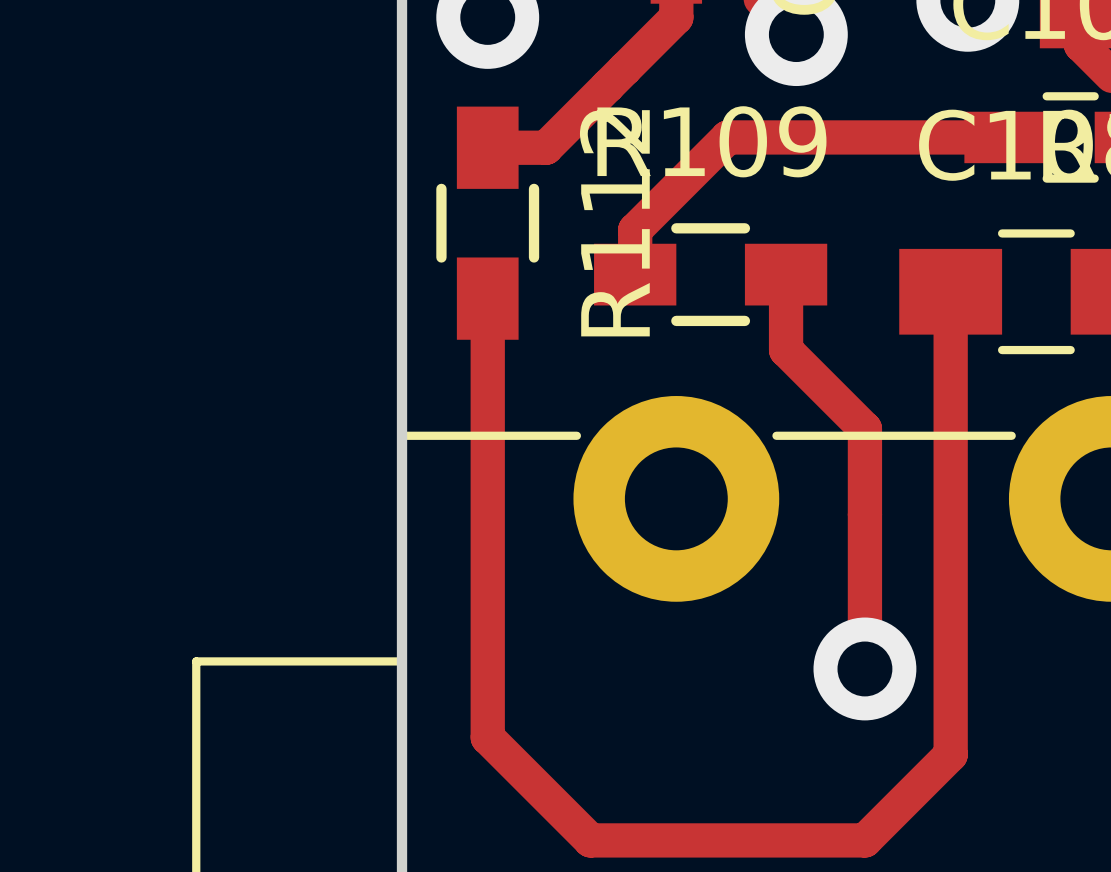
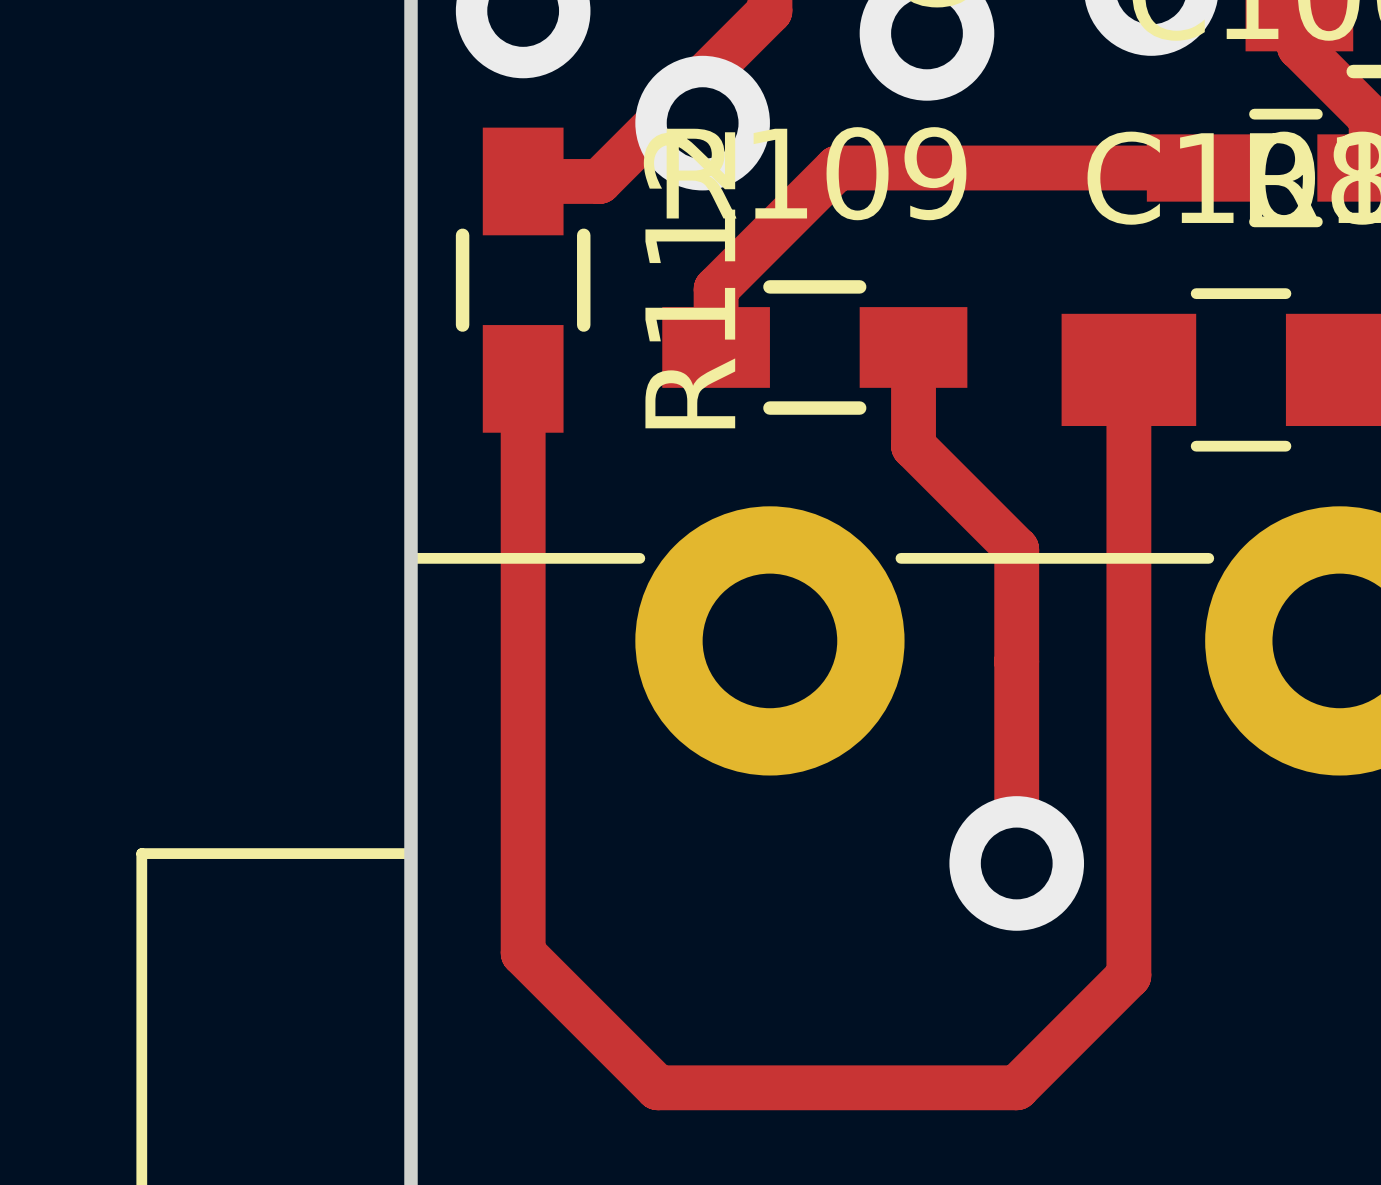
via: none -> (702, 123)

